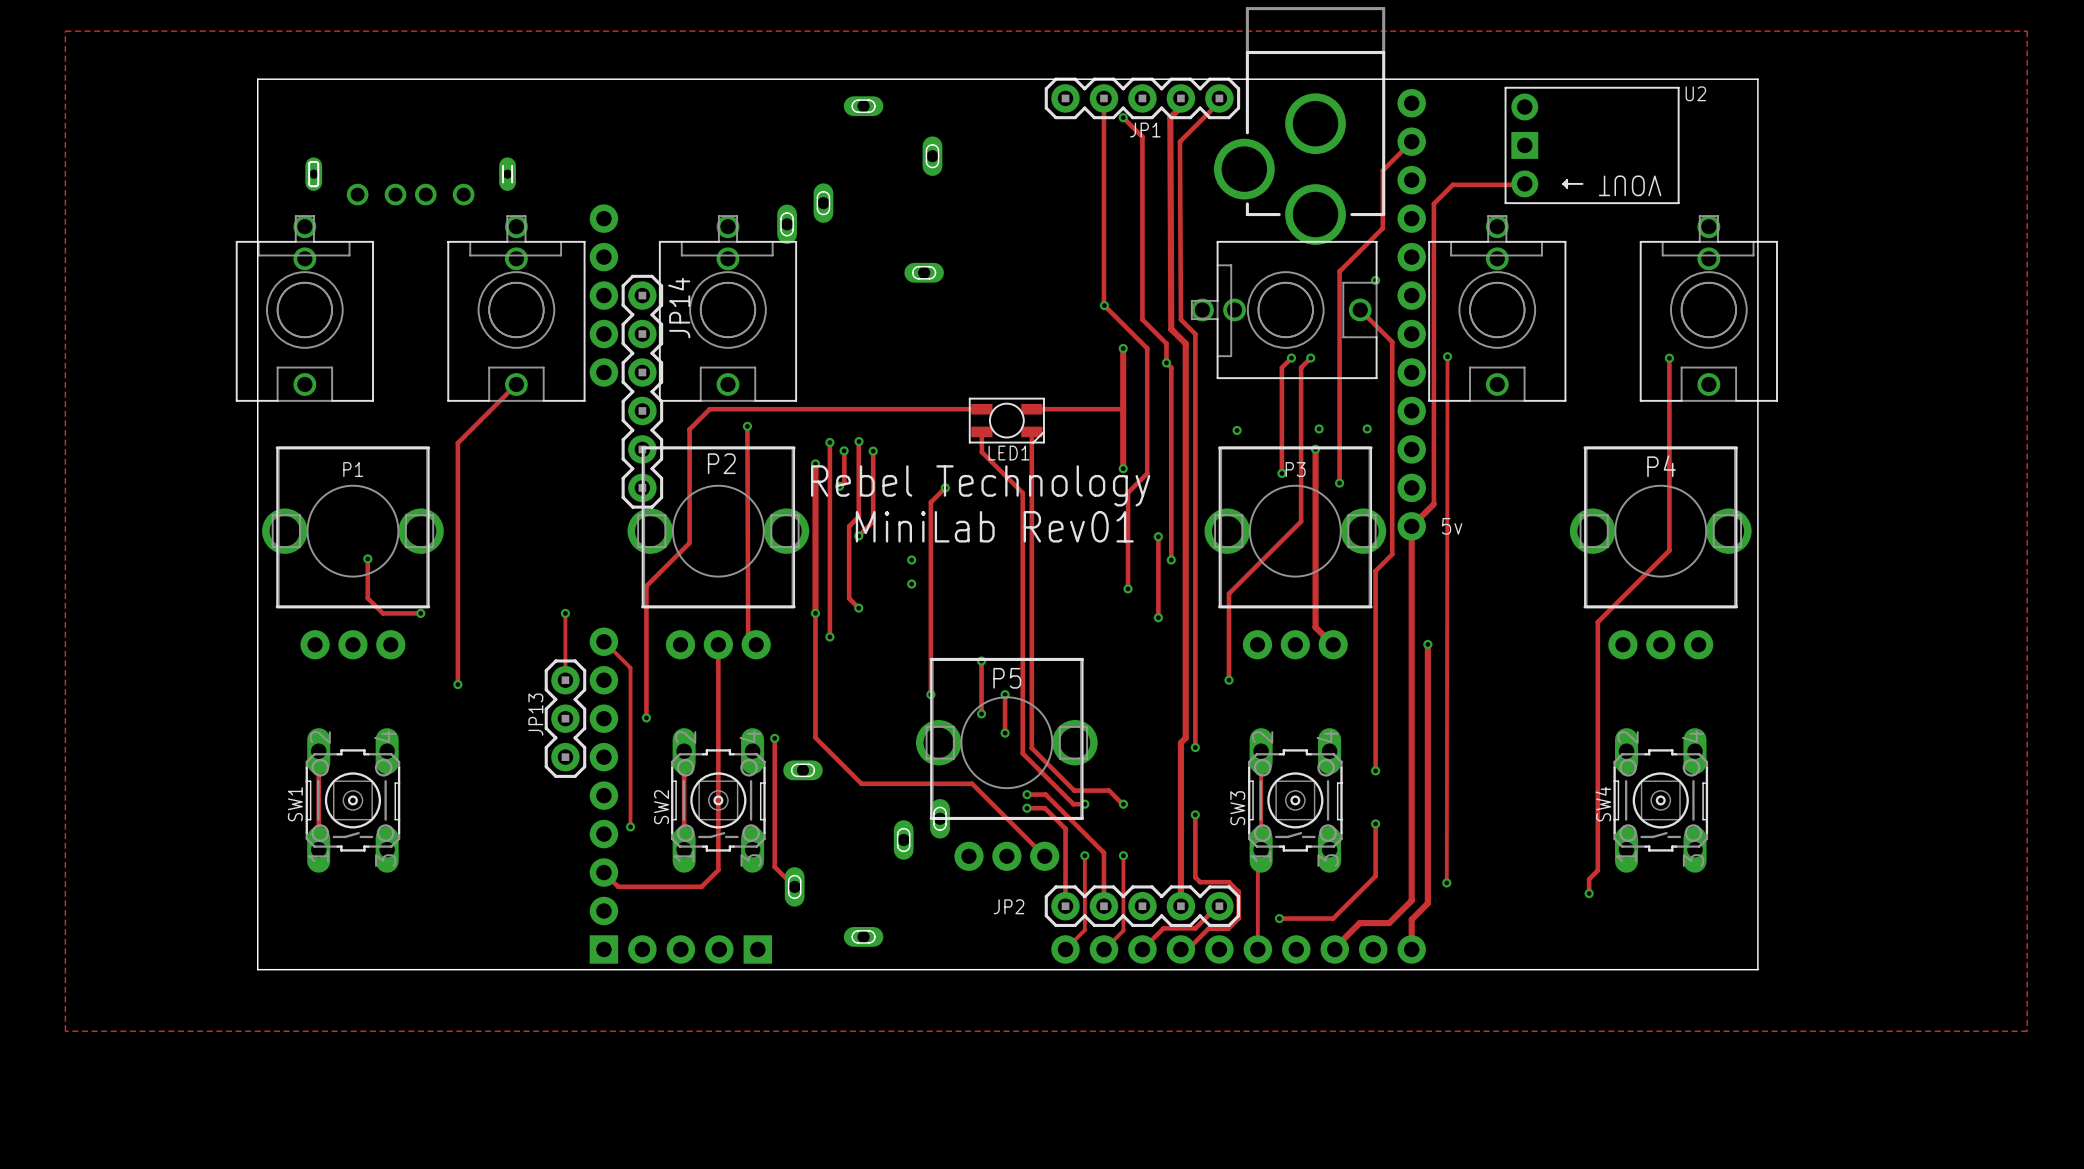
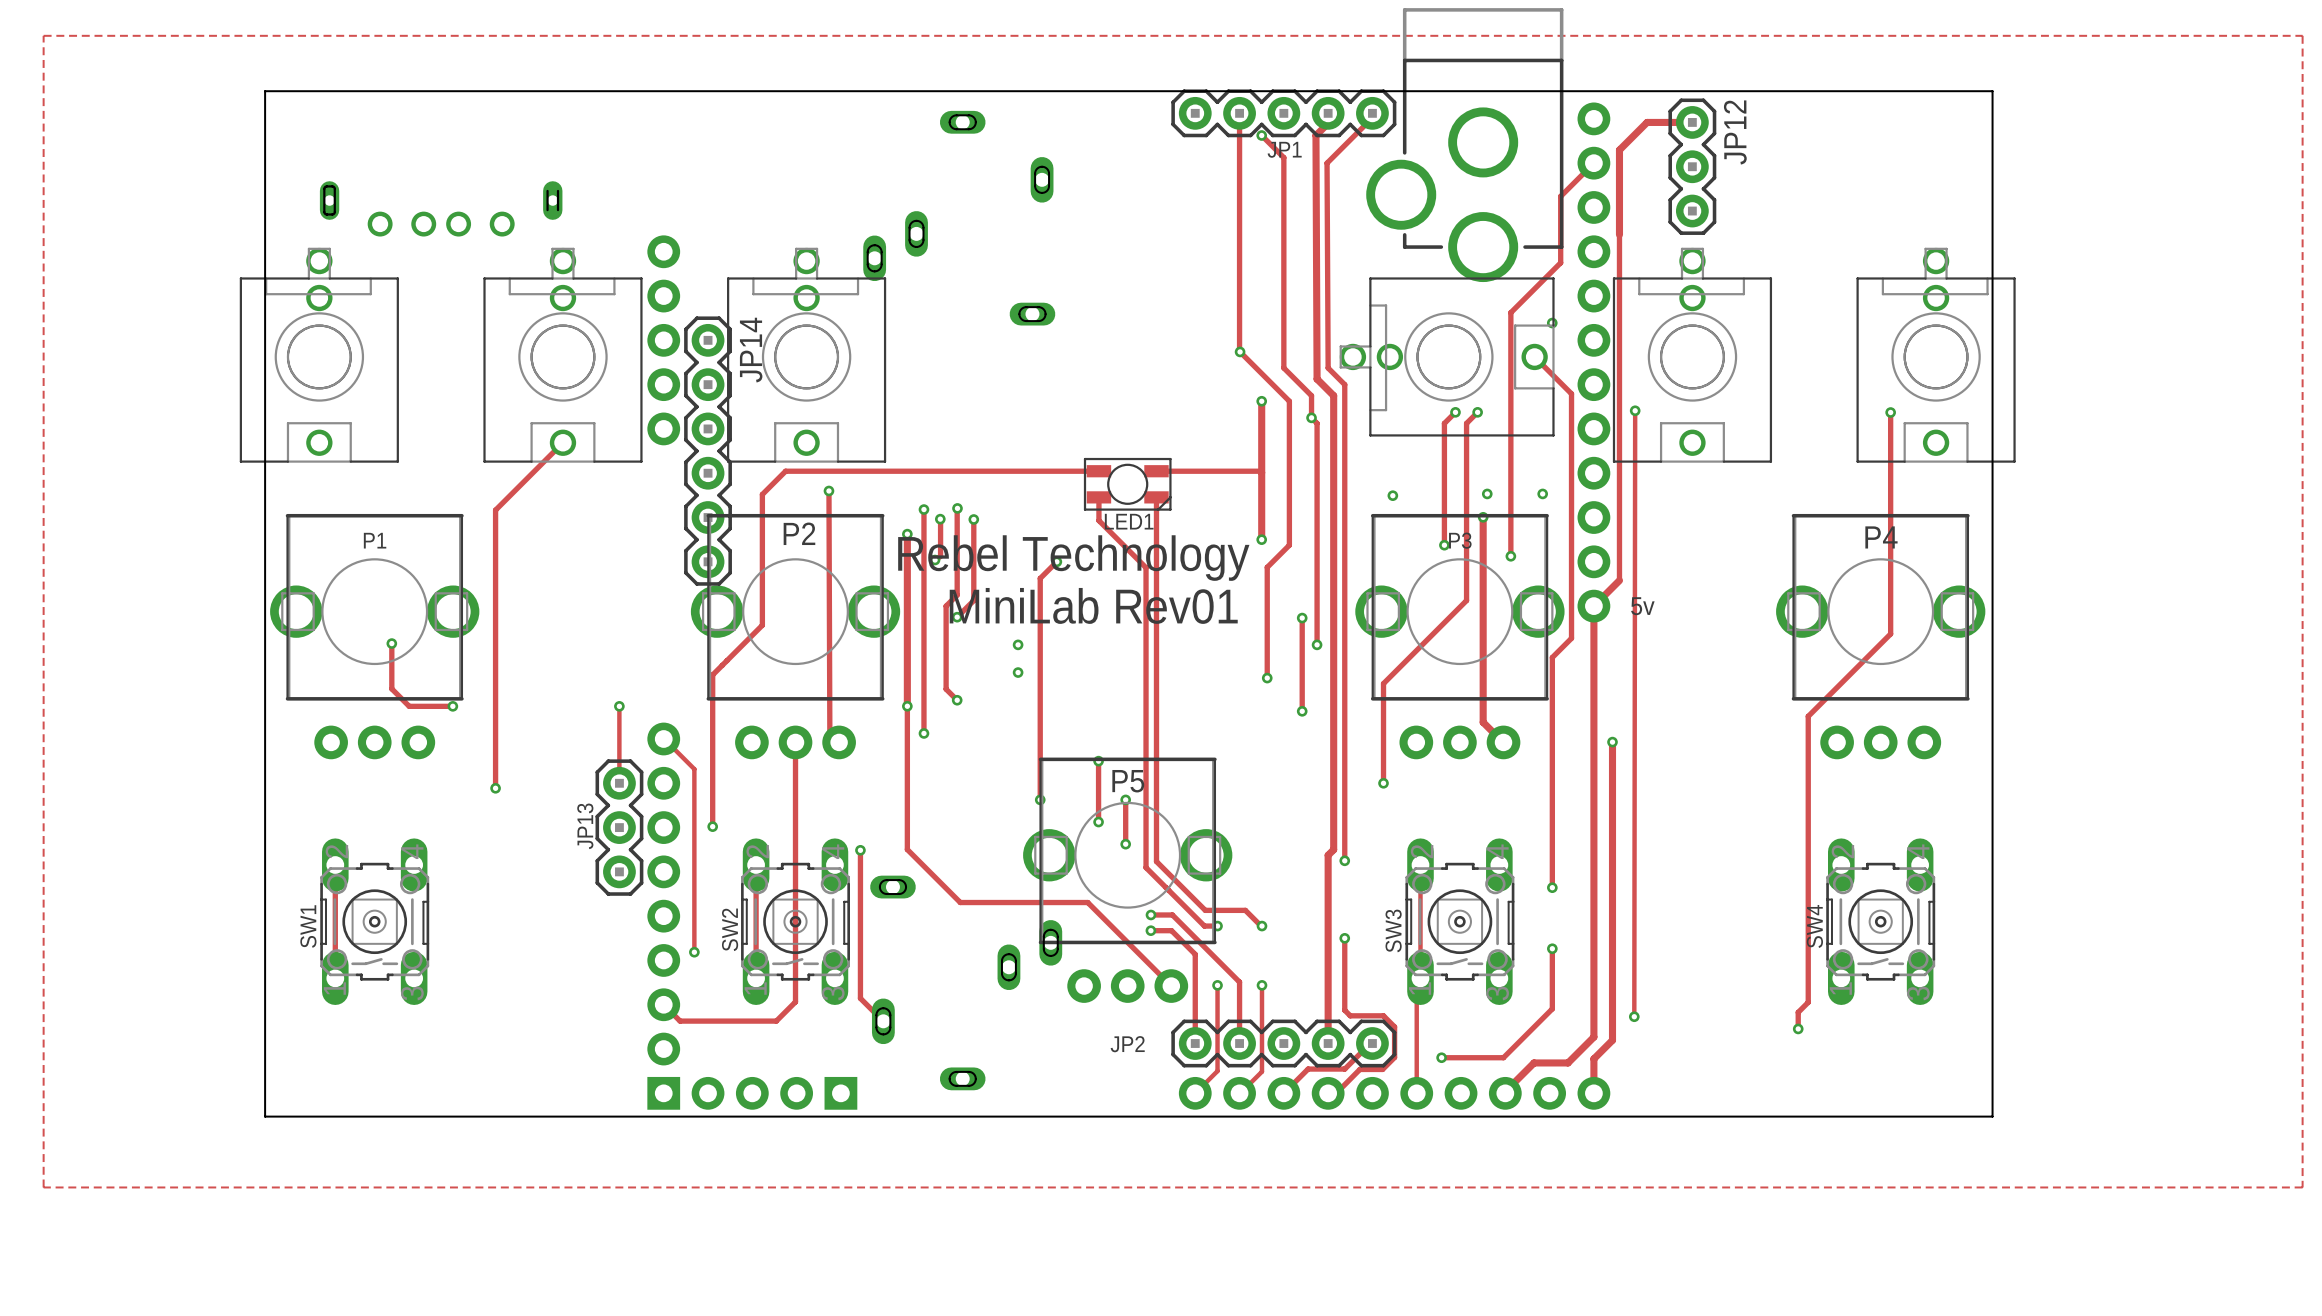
JP12: none -> (1692, 166)
U2: (1592, 145) -> none
track: (1524, 183) (1452, 184) (1433, 203) -> (1692, 122) (1647, 122) (1619, 150) (1619, 234)

